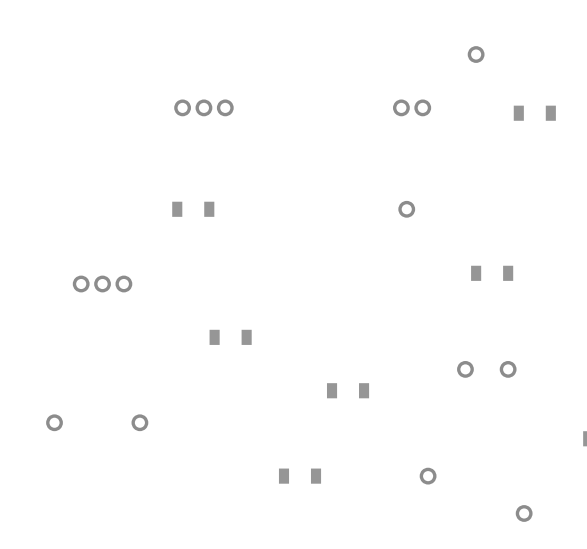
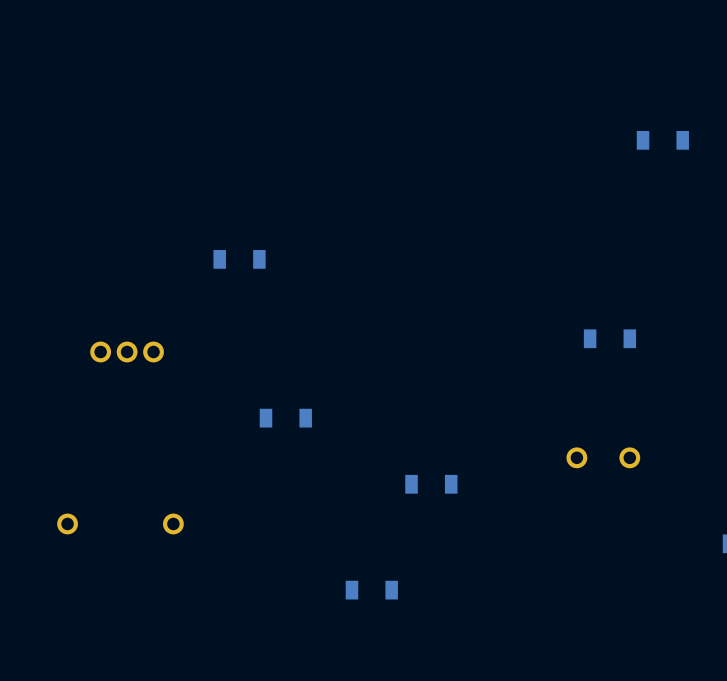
part: (476, 54) -> none
part: (203, 107) -> none
part: (412, 107) -> none
part: (406, 209) -> none
part: (428, 476) -> none
part: (524, 513) -> none

